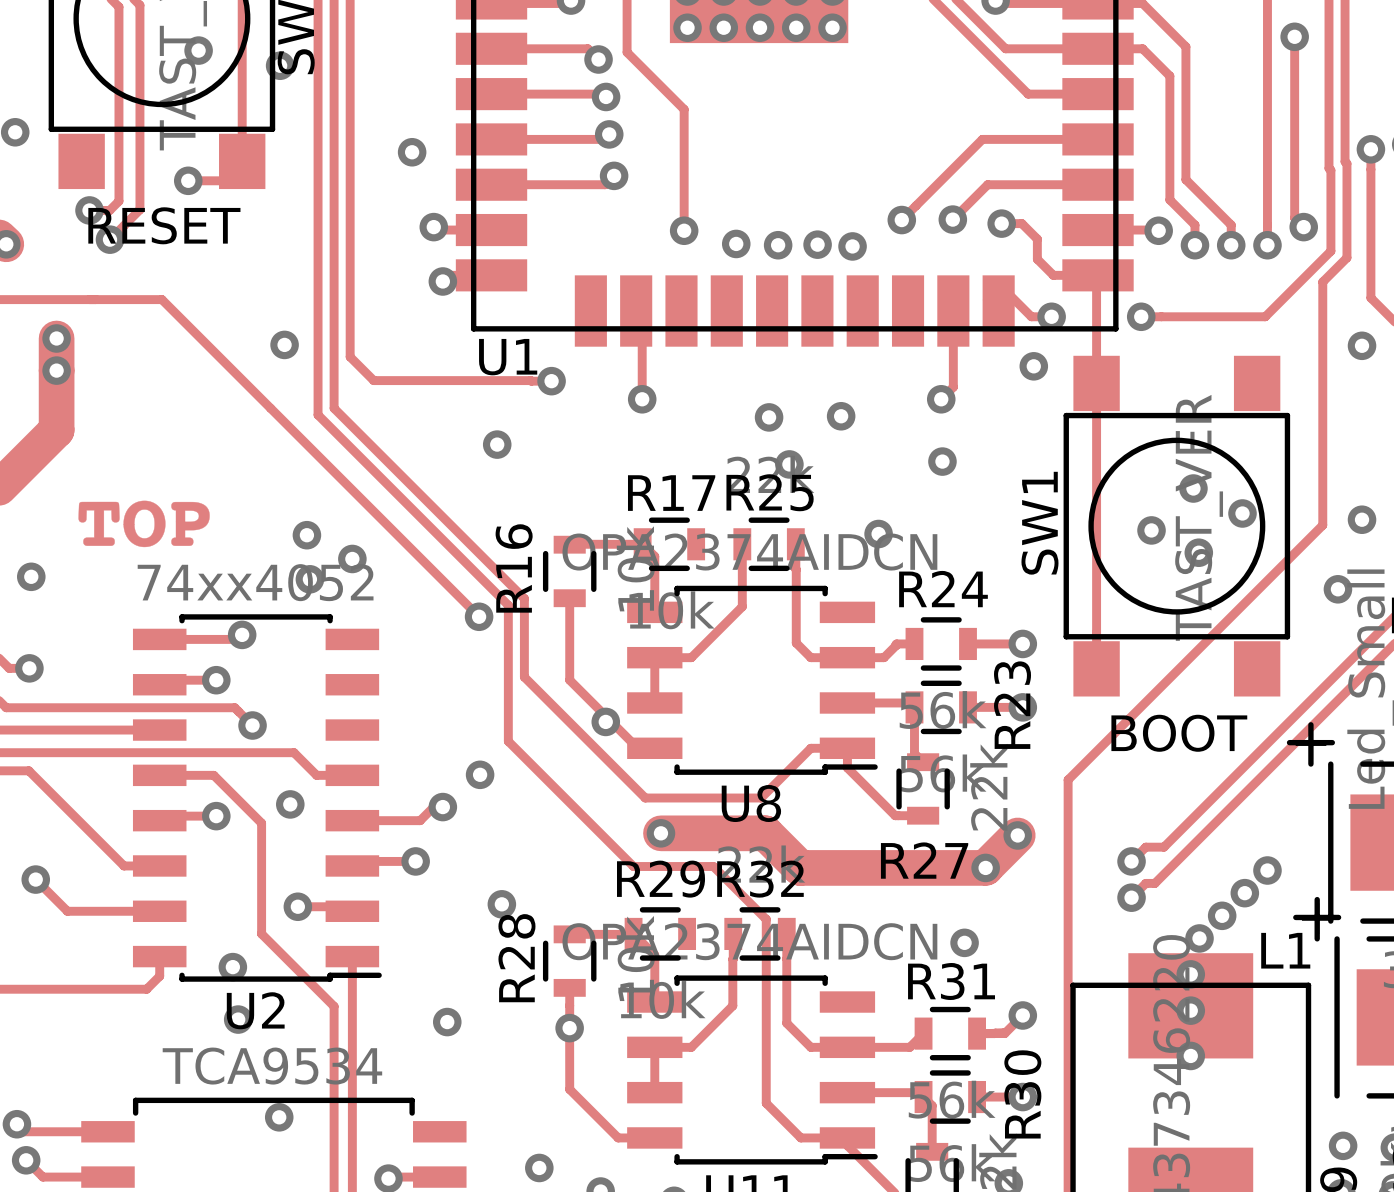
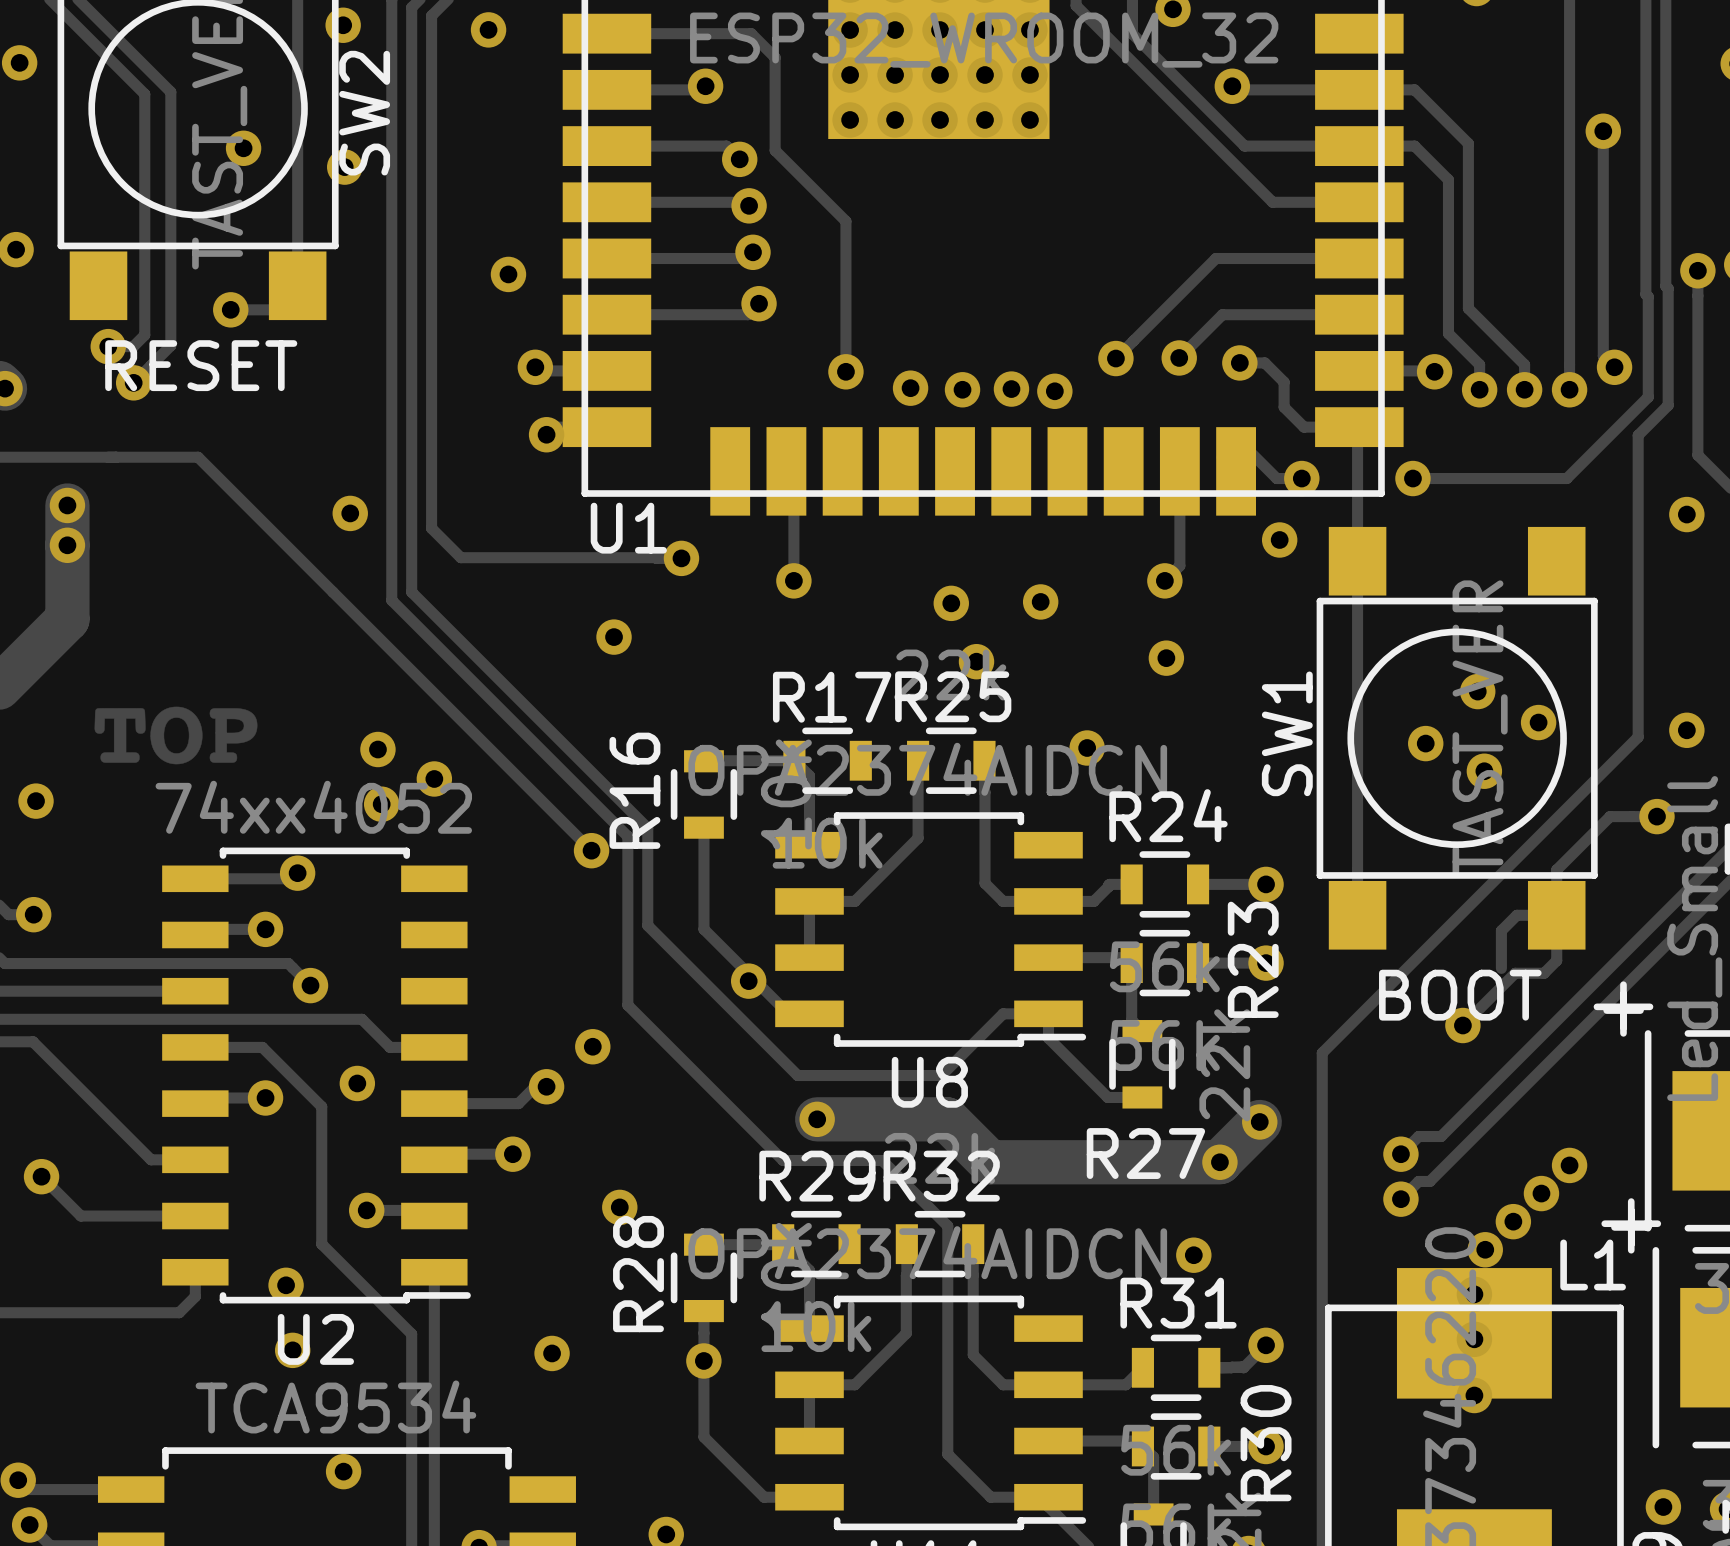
track: none -> (1656, 816) (1610, 816) (1556, 869) (1556, 960) (1544, 973) (1515, 973) (1462, 1025)
track: none -> (1556, 915) (1516, 915) (1501, 930) (1501, 968)
via: none -> (1462, 1025)

